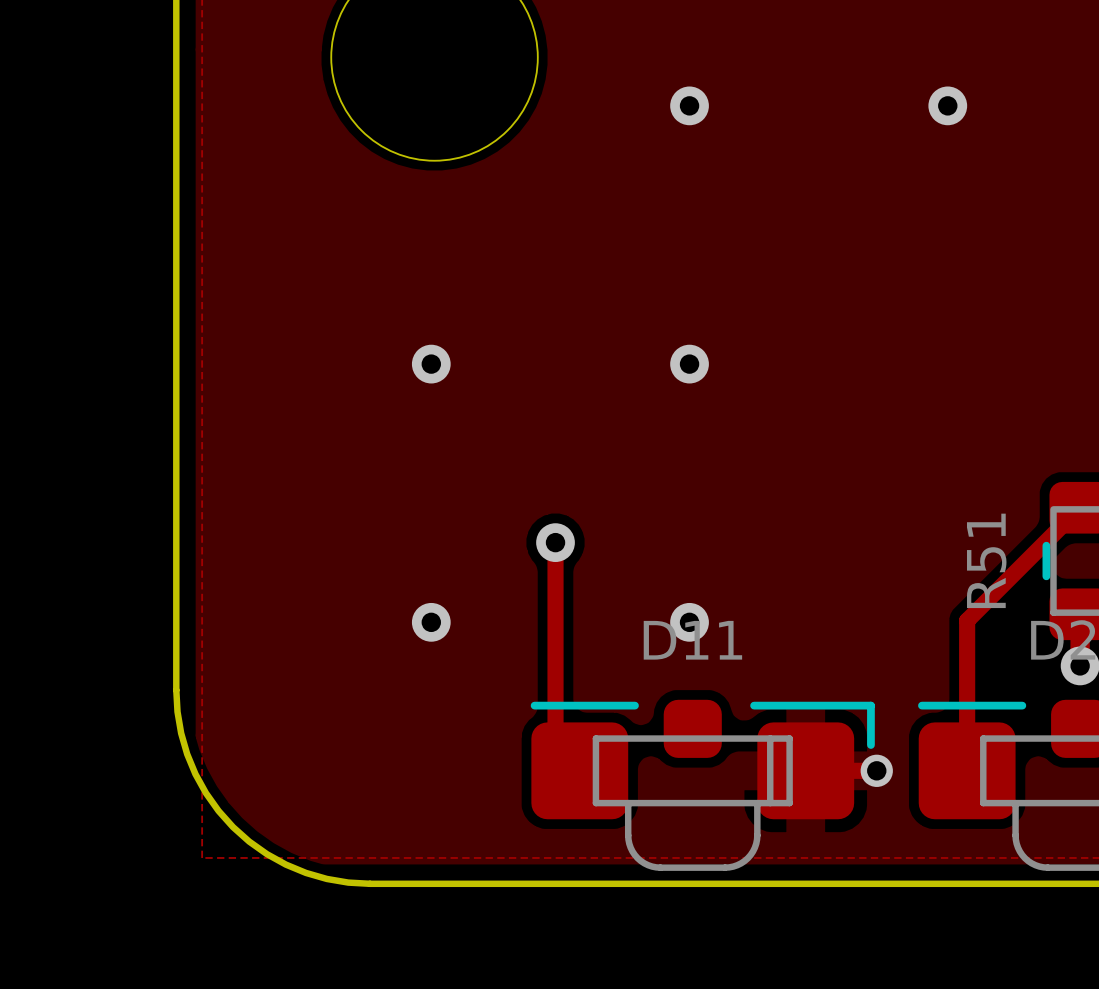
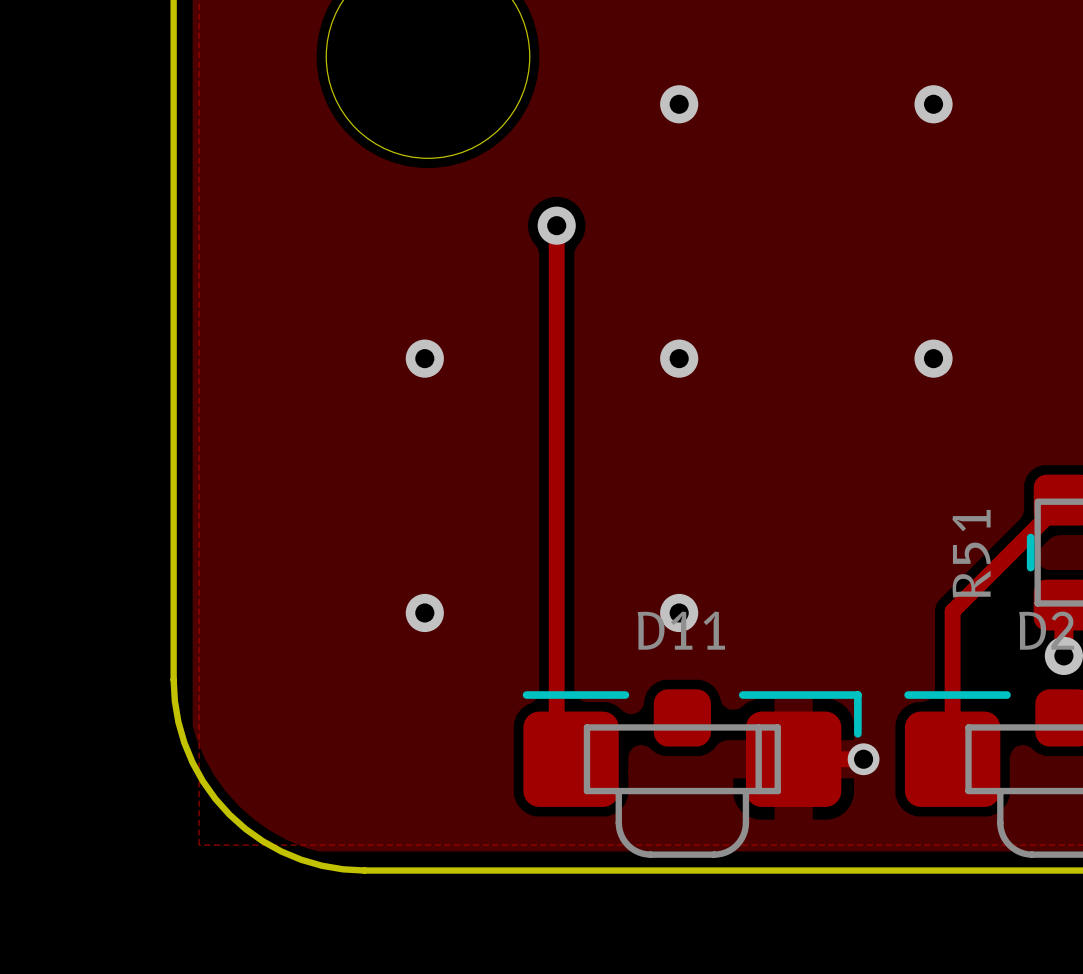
via: none -> (556, 225)
via: none -> (933, 358)
track: (555, 542) (555, 746) (565, 756) -> (556, 225) (556, 744)
via: (555, 542) -> none

